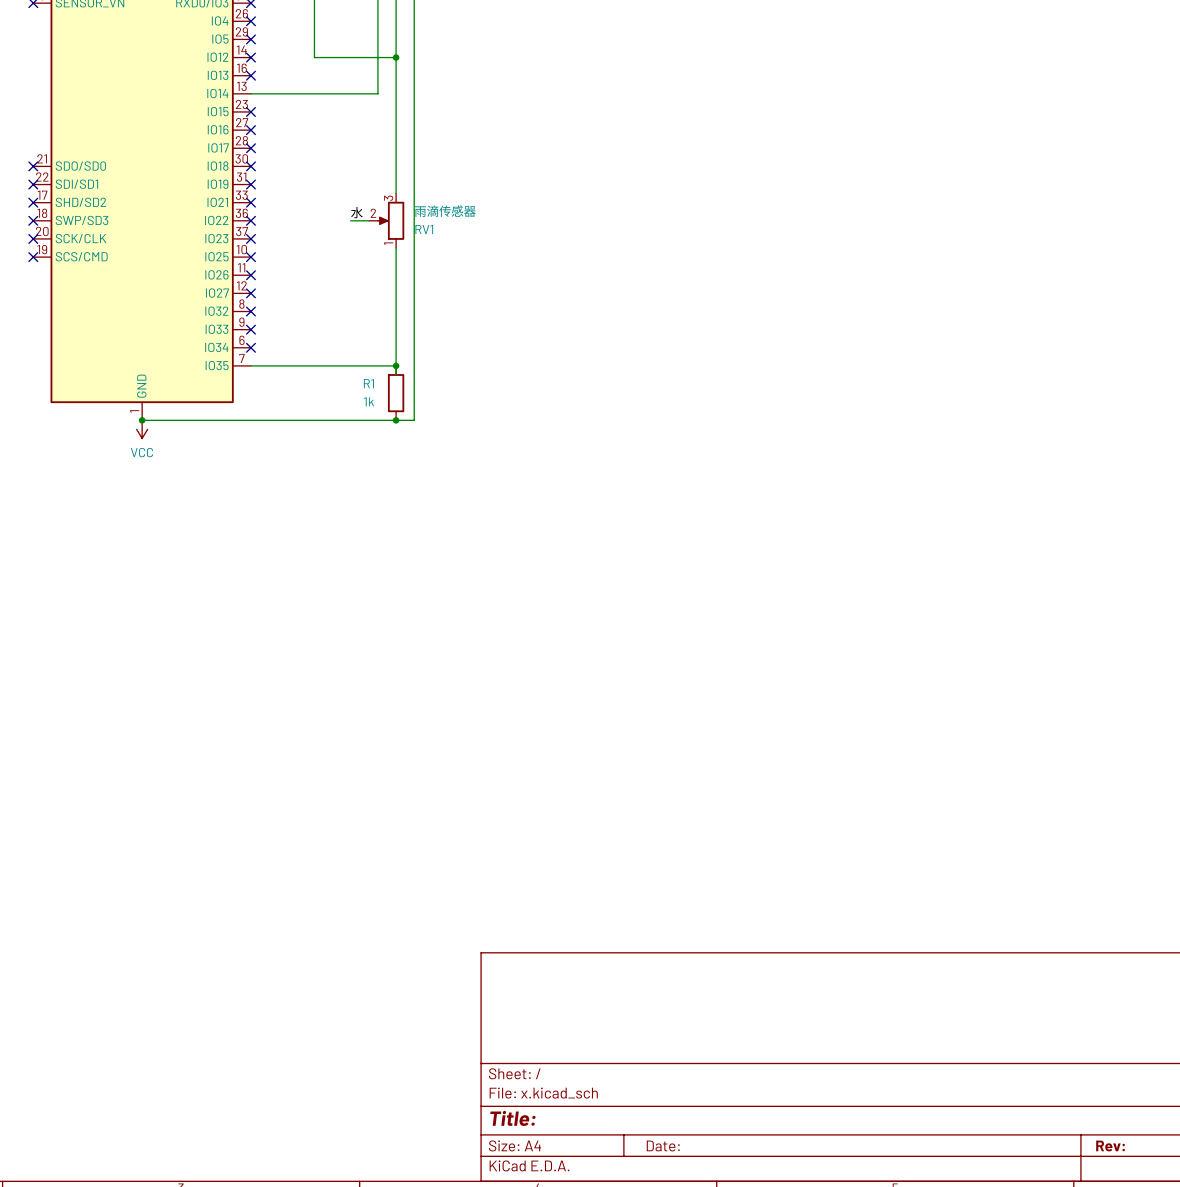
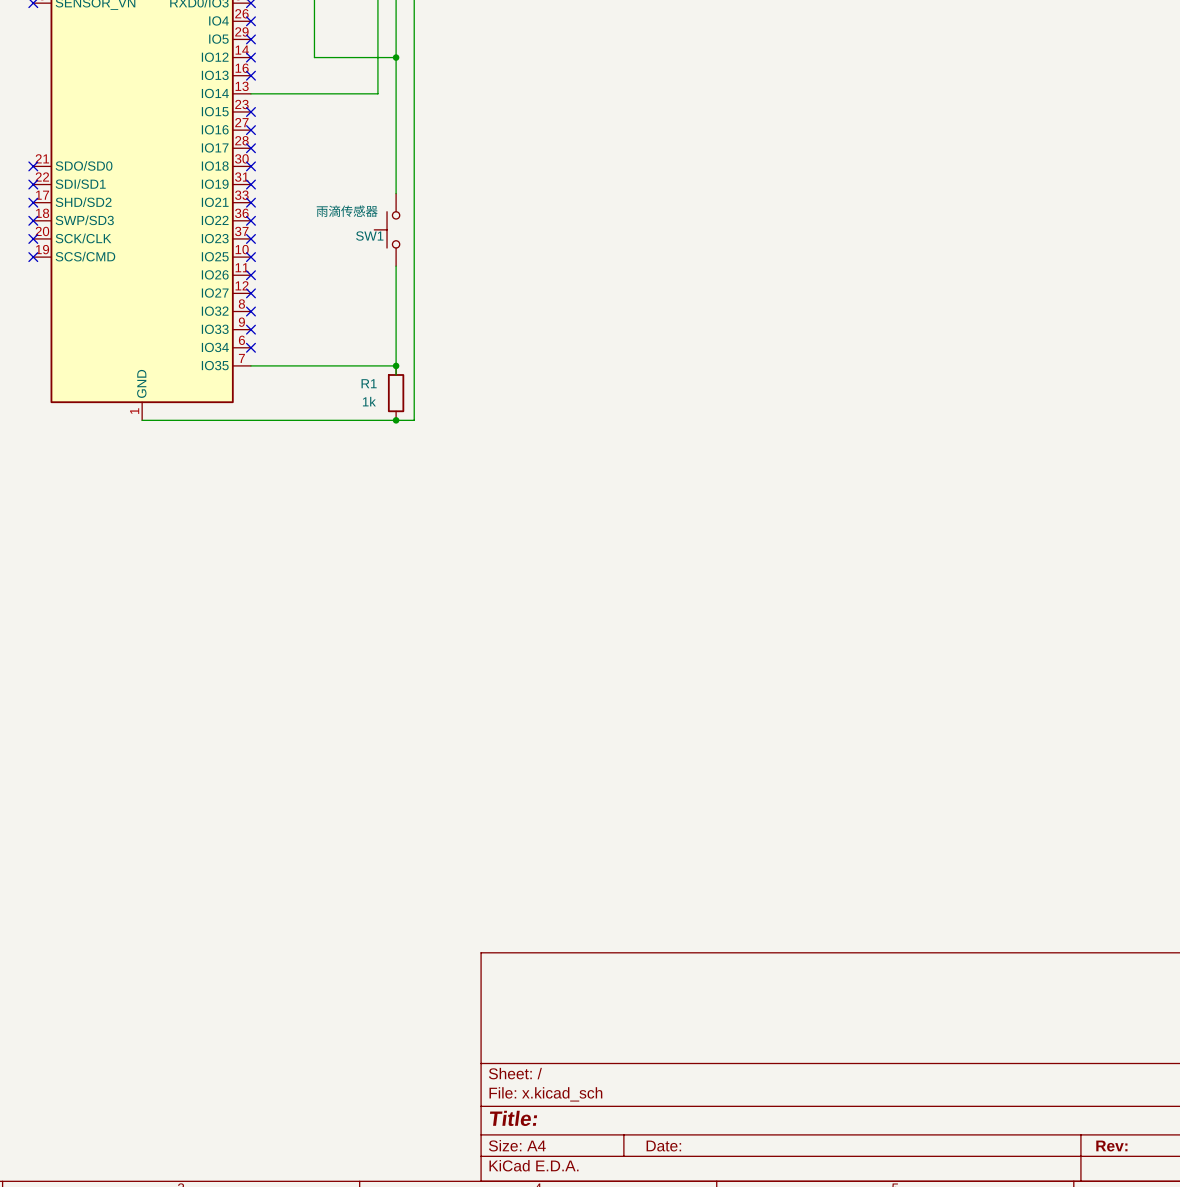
label: 水 (356, 212) -> none
wire: (350, 220) (368, 220) -> none
RV1: 雨滴传感器 (386, 220) -> none
SW1: none -> 雨滴传感器 (387, 229)
junction: (142, 420) -> none
power symbol: VCC (142, 429) -> none

